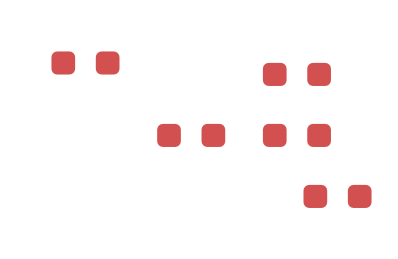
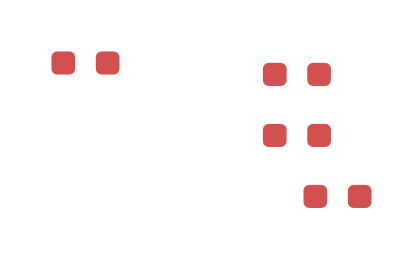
part: (191, 135) -> none

